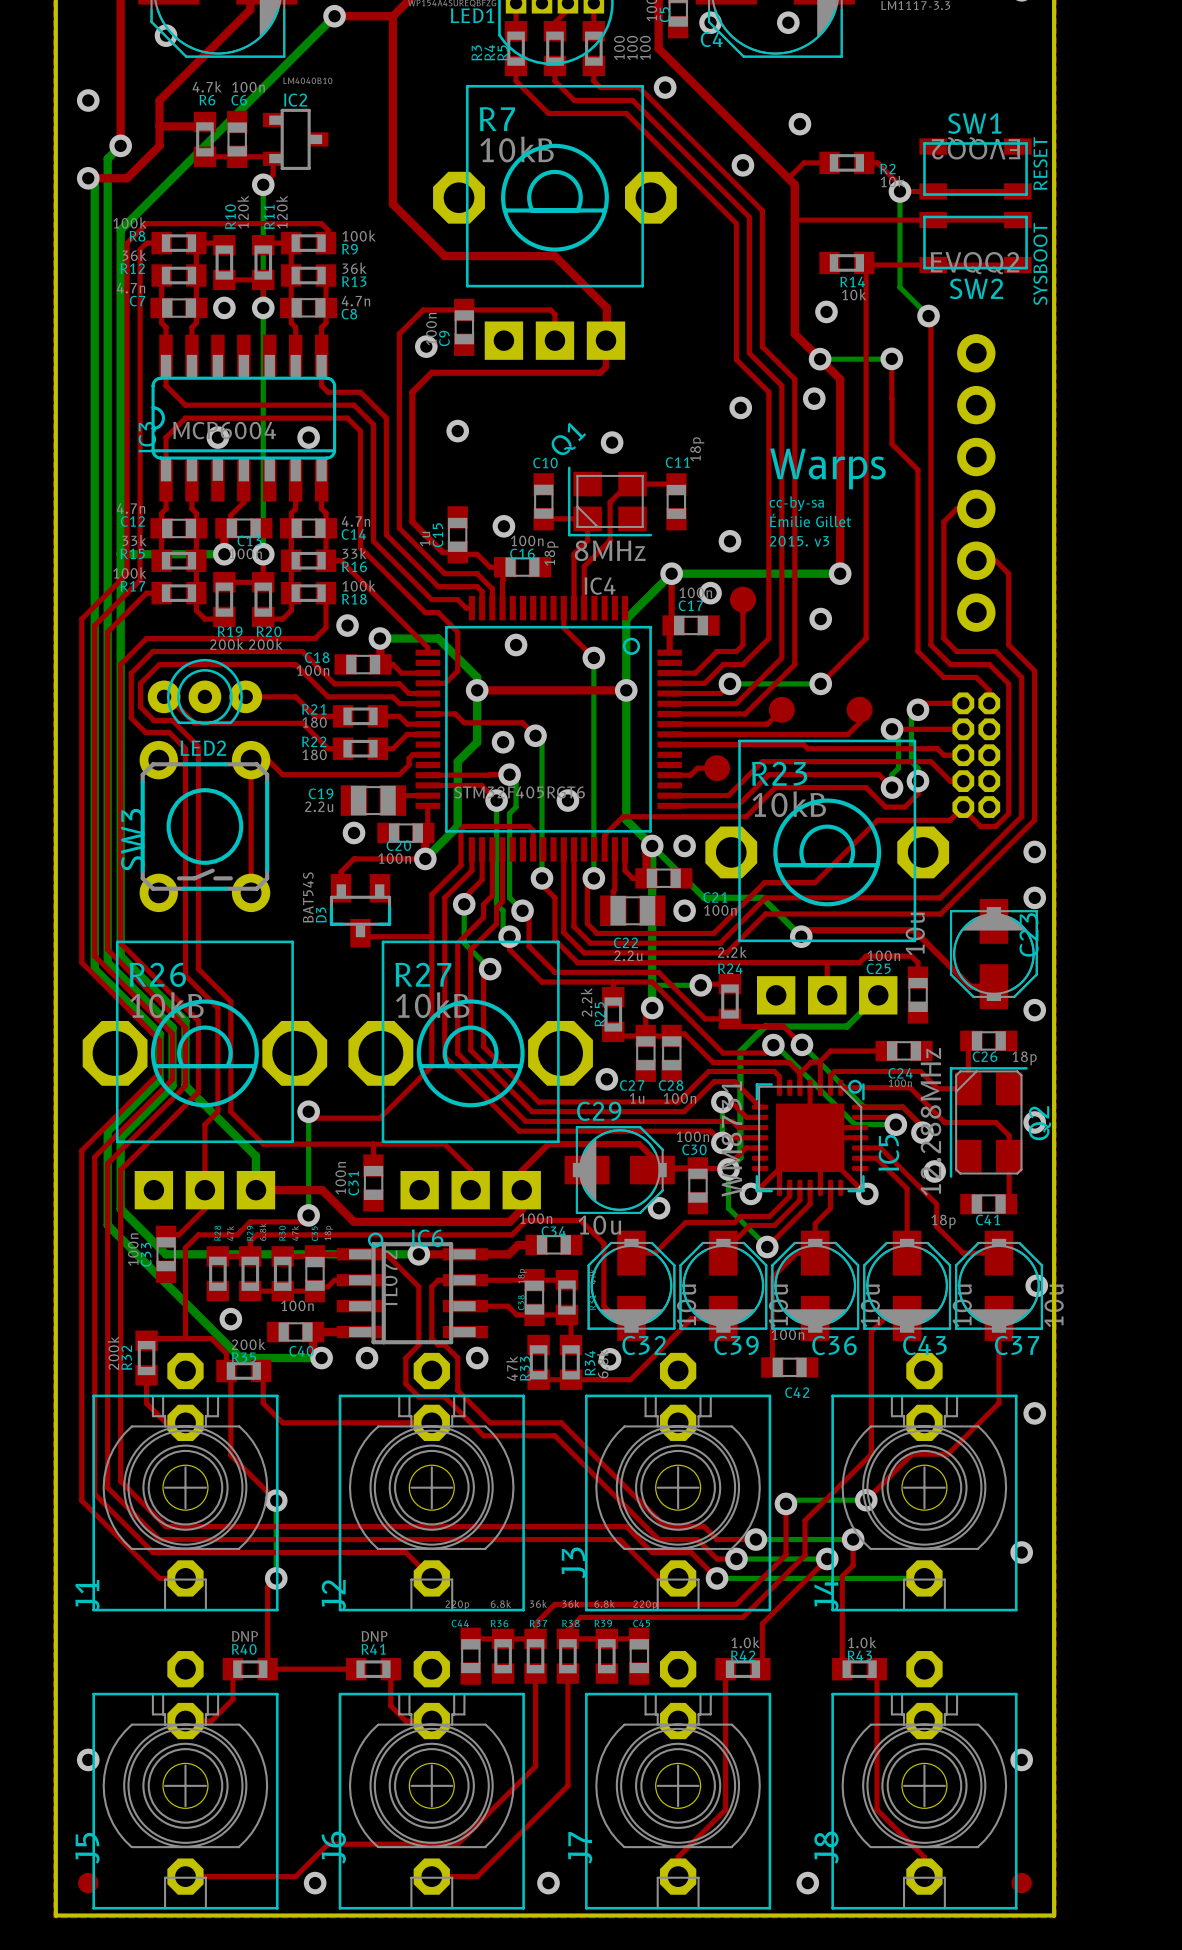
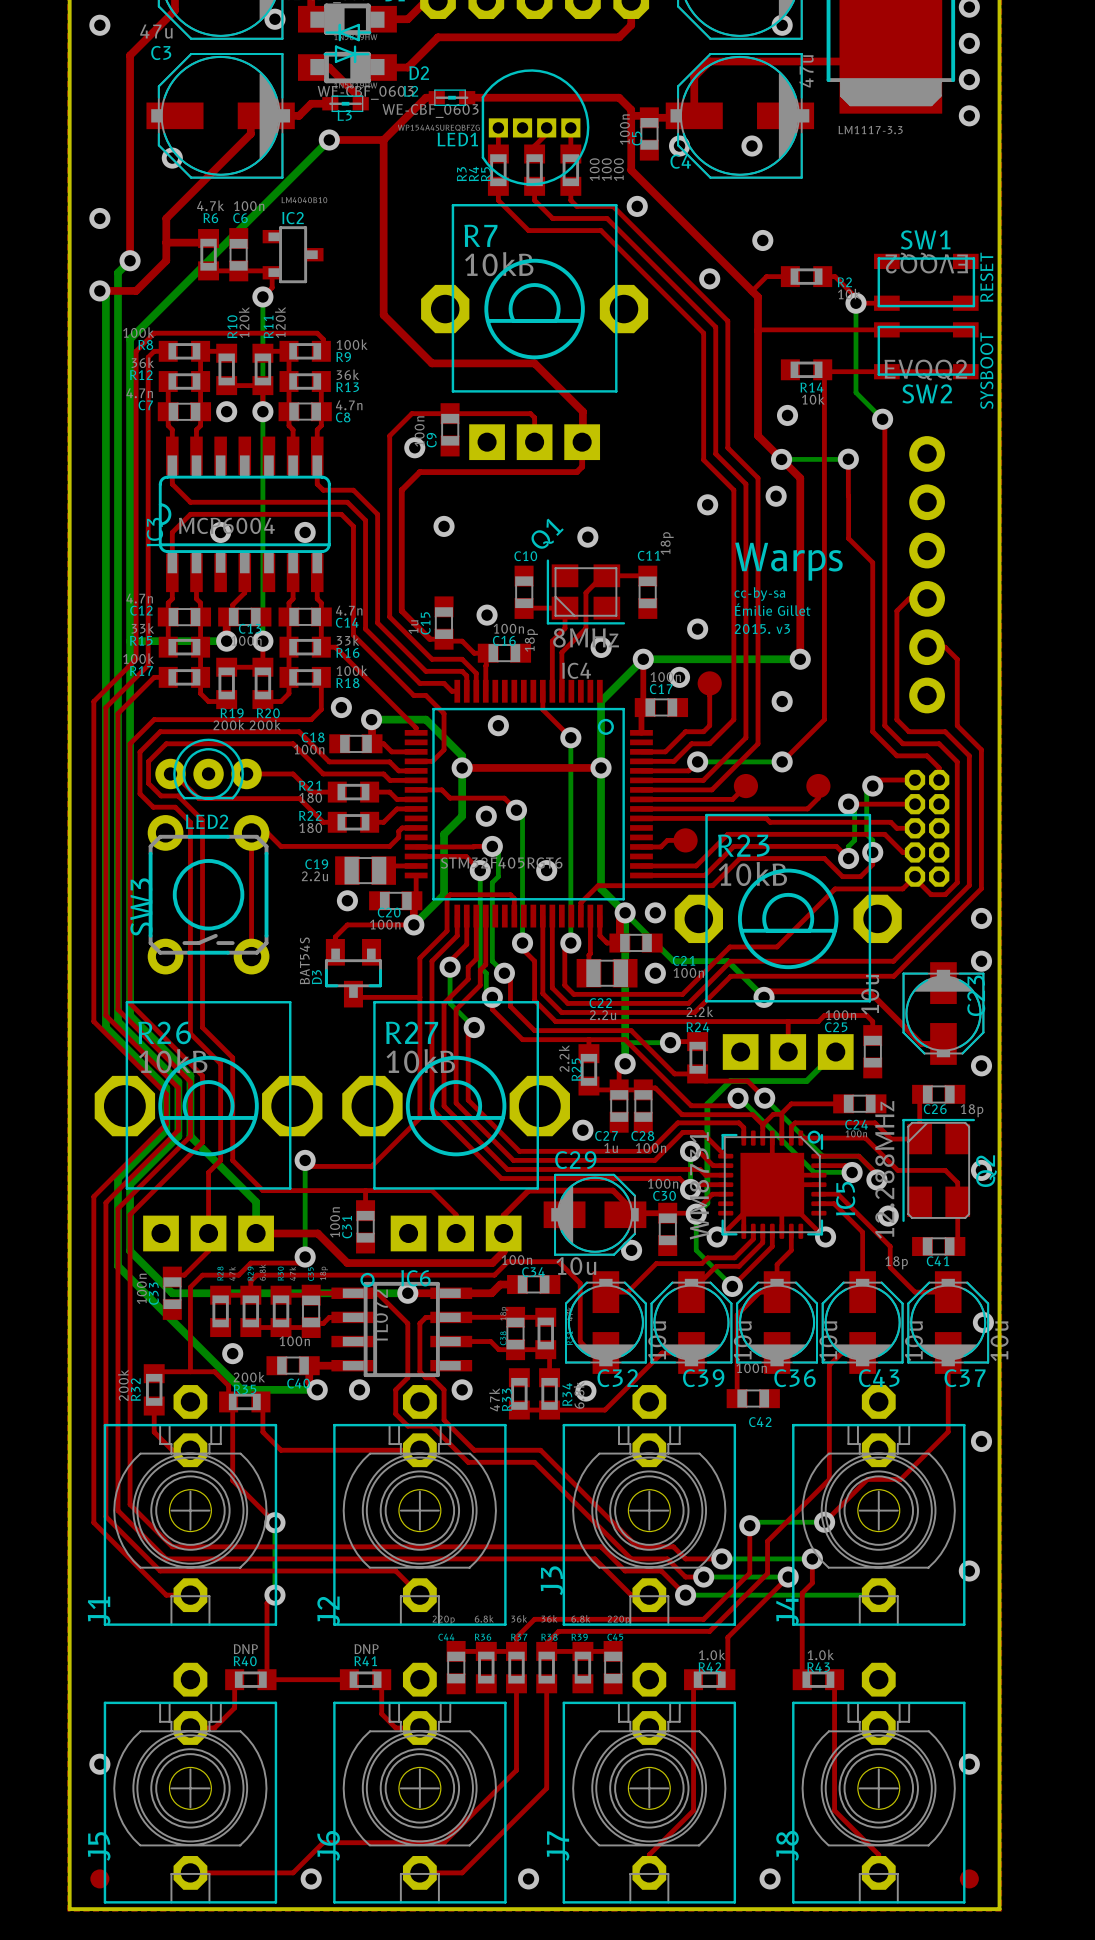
via: none -> (601, 647)

